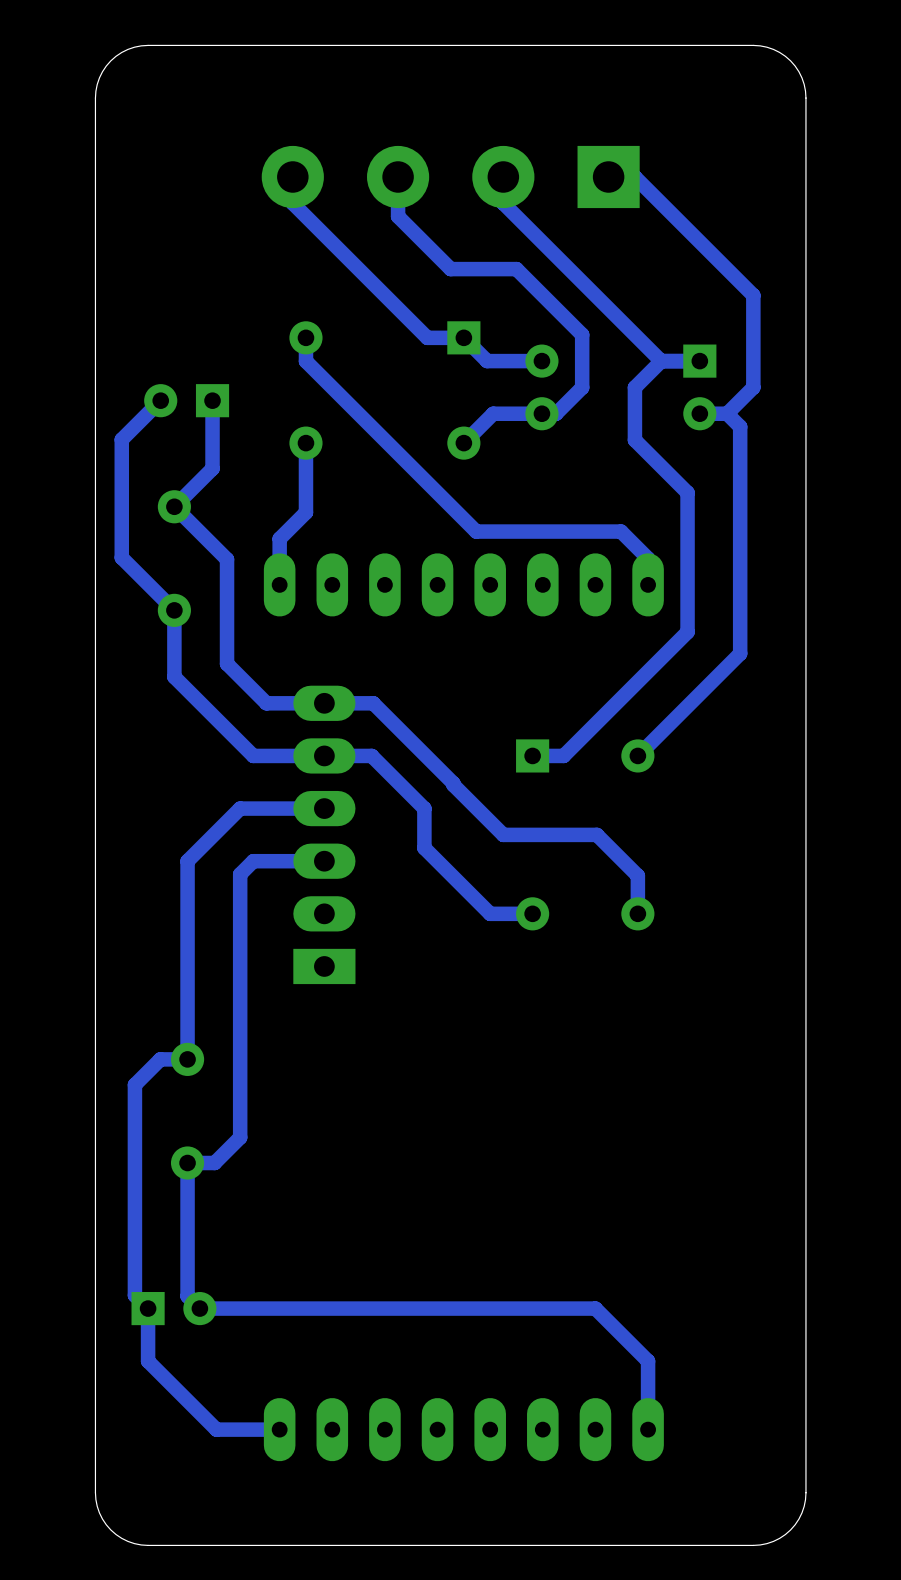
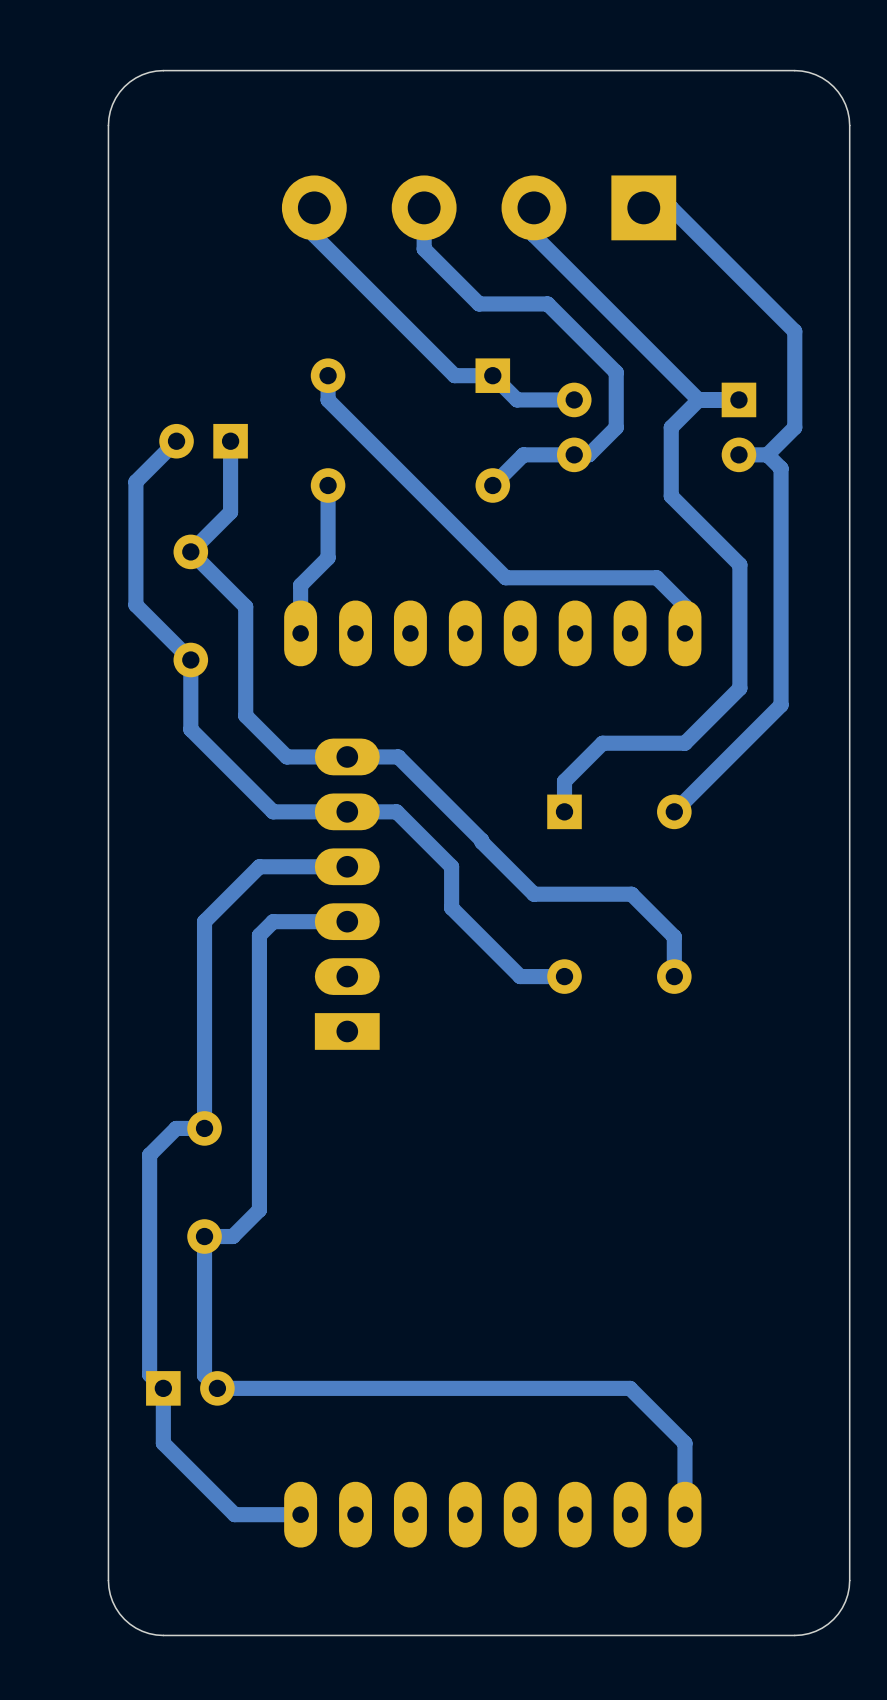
bottom track: (634, 440) (687, 492) (687, 632) (563, 755) (532, 755) -> (671, 482) (671, 496) (739, 564) (739, 688) (684, 743) (602, 743) (564, 781) (564, 811)

